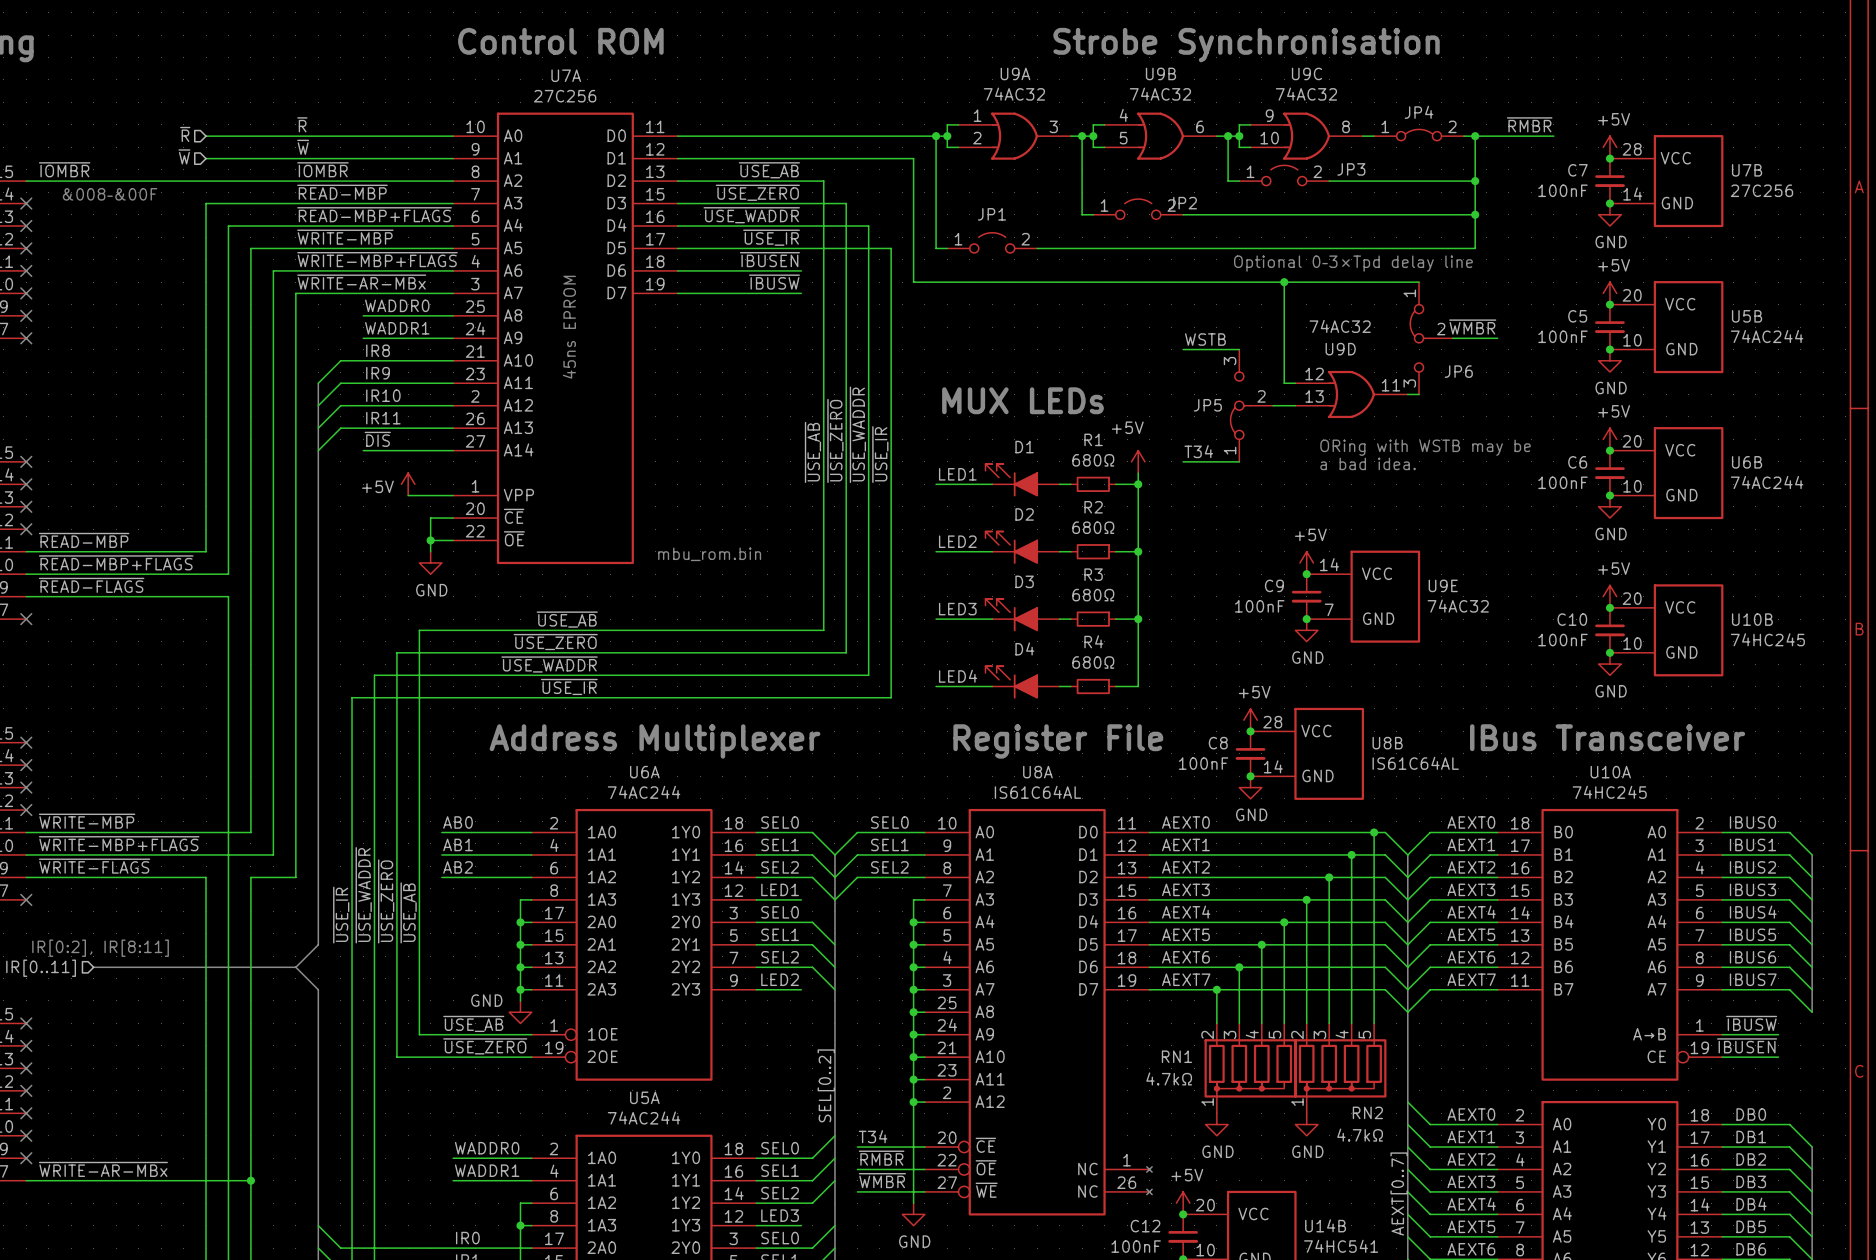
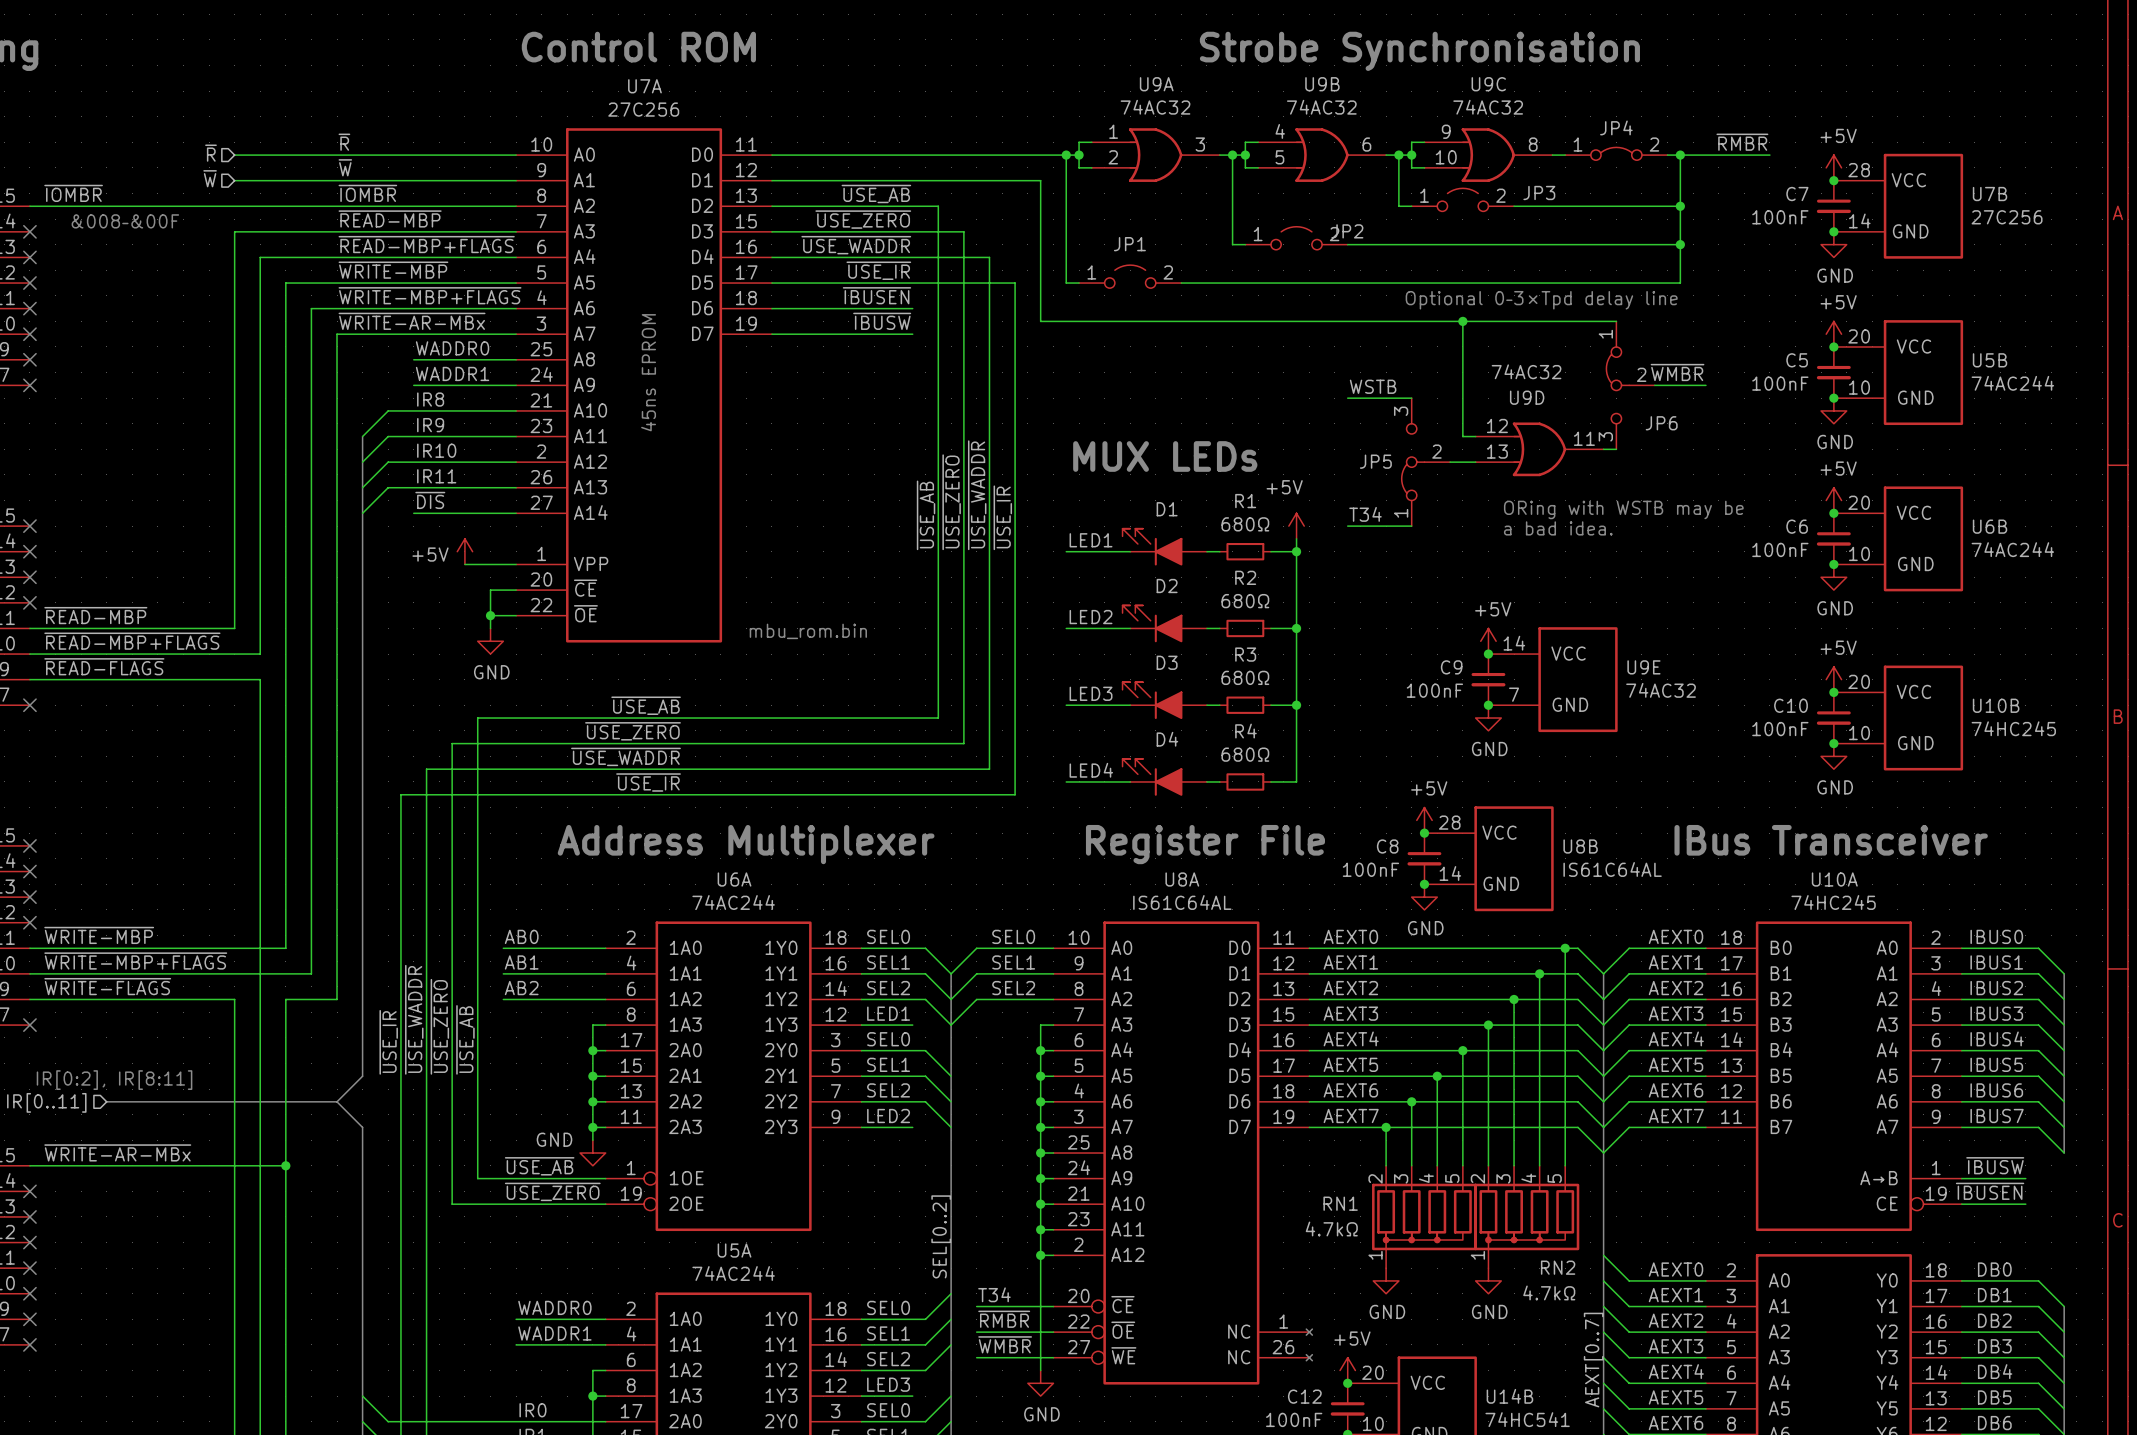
no-connect mark: (26, 1023) -> none
junction: none -> (285, 1165)
label position: ~{WRITE-AR-MBx} (103, 1169) -> ~{WRITE-AR-MBx} (117, 1152)
wire: (26, 1180) (250, 1180) -> (29, 1165) (285, 1165)
no-connect mark: none -> (29, 1344)
junction: (250, 1180) -> none

